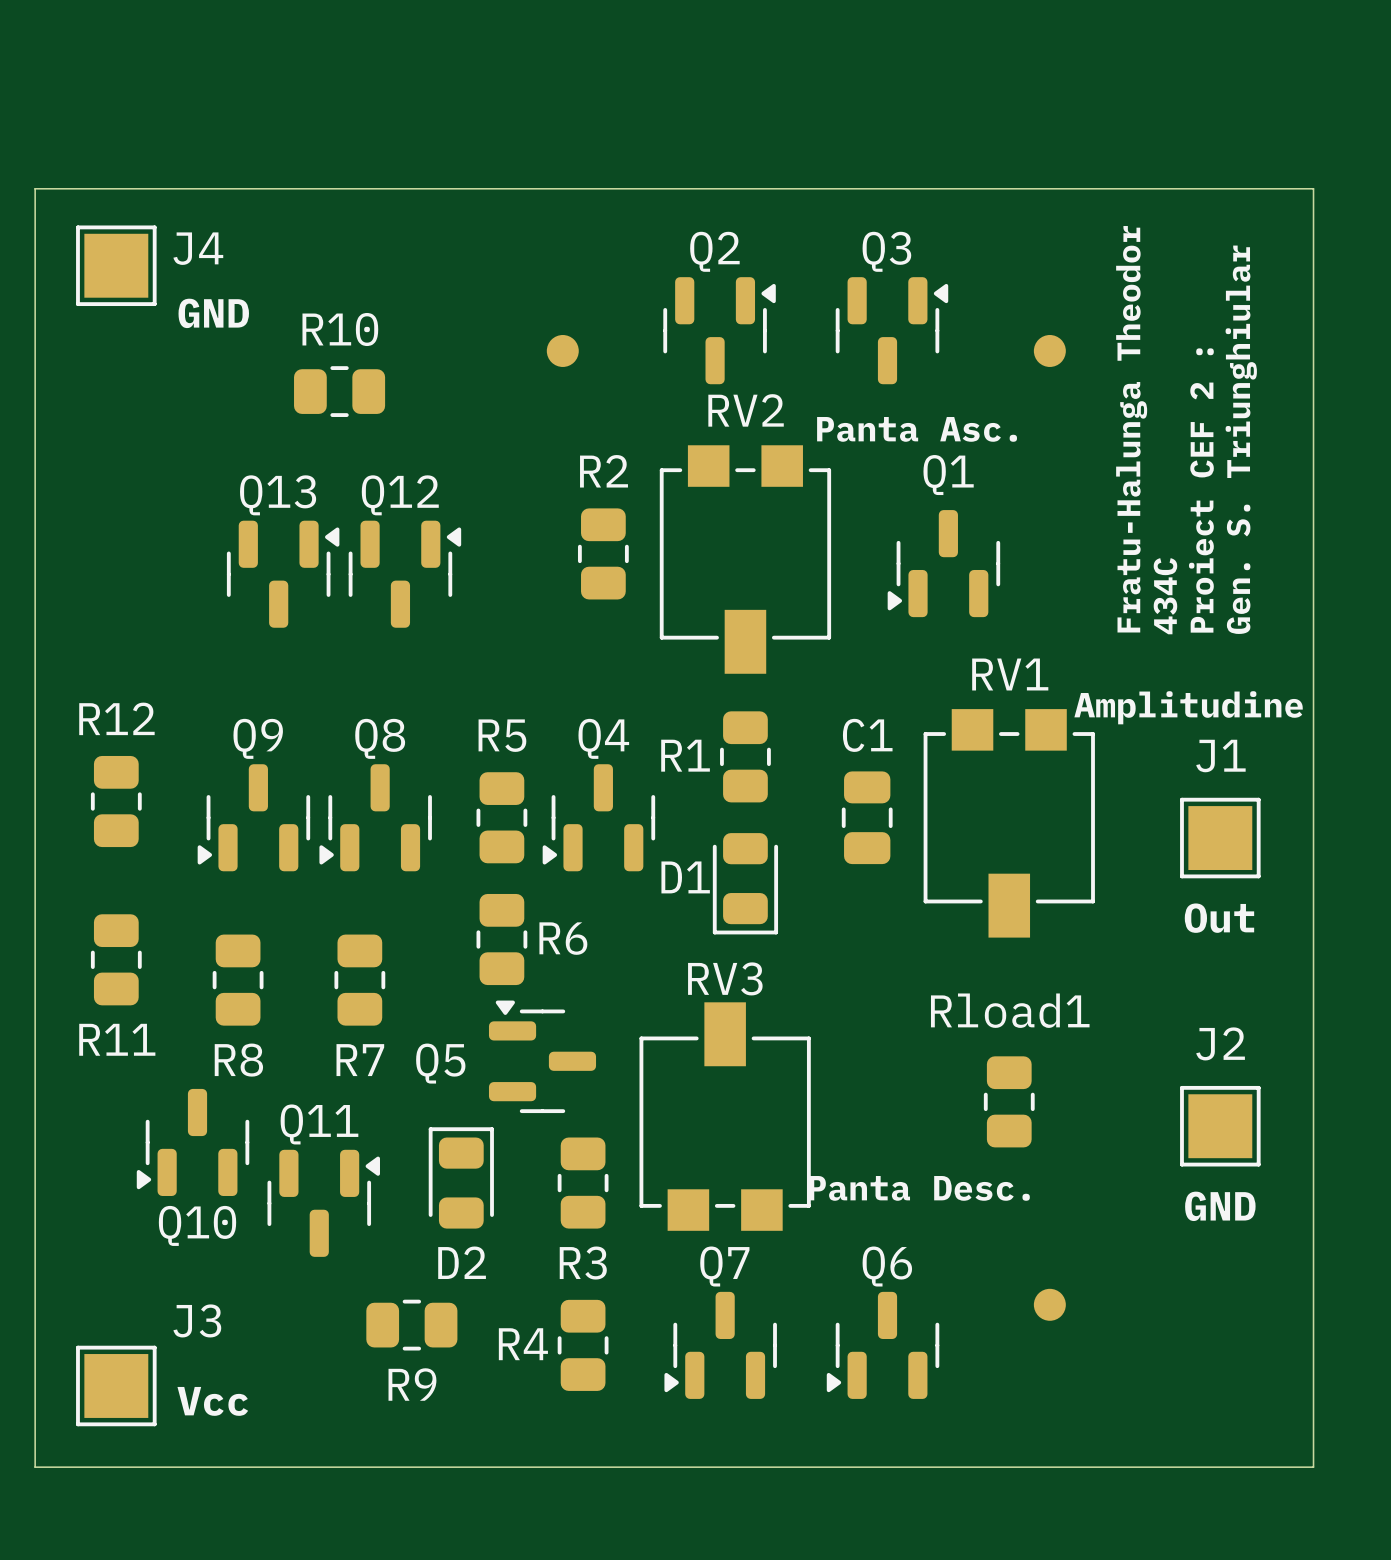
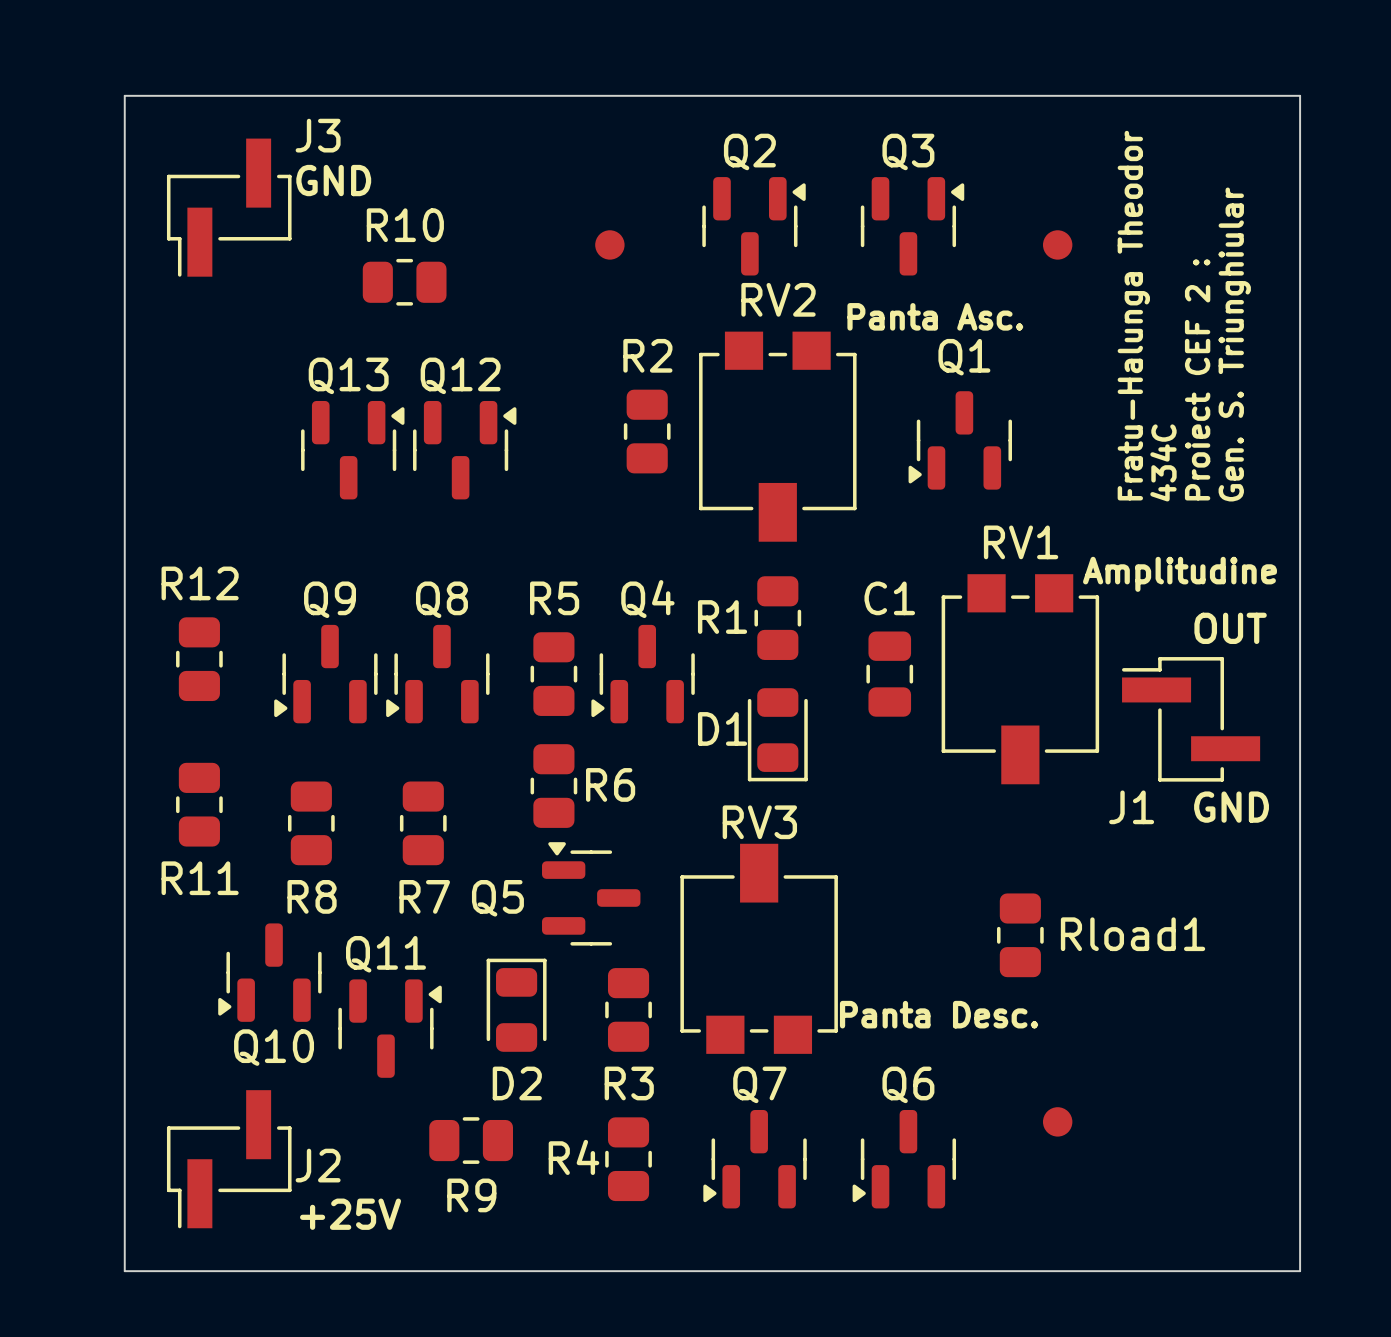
J4: GND (116, 265) -> none
J1 name position: J1 (1220, 756) -> J1 (1131, 807)
J1 footprint: [1180, 797, 1261, 879] -> [1122, 657, 1261, 782]
J1 value: Out (1219, 918) -> OUT (1230, 628)
text: none -> GND (1231, 807)
Rload1 name position: Rload1 (1010, 1010) -> Rload1 (1133, 934)
J2 name position: J2 (1220, 1043) -> J2 (318, 1165)
J2 footprint: [1180, 1085, 1261, 1167] -> [166, 1090, 292, 1229]
J2 value: GND (1220, 1206) -> +25V (350, 1214)
J3 footprint: [76, 1345, 157, 1427] -> [166, 138, 292, 277]
J3 value: Vcc (212, 1401) -> GND (333, 180)

